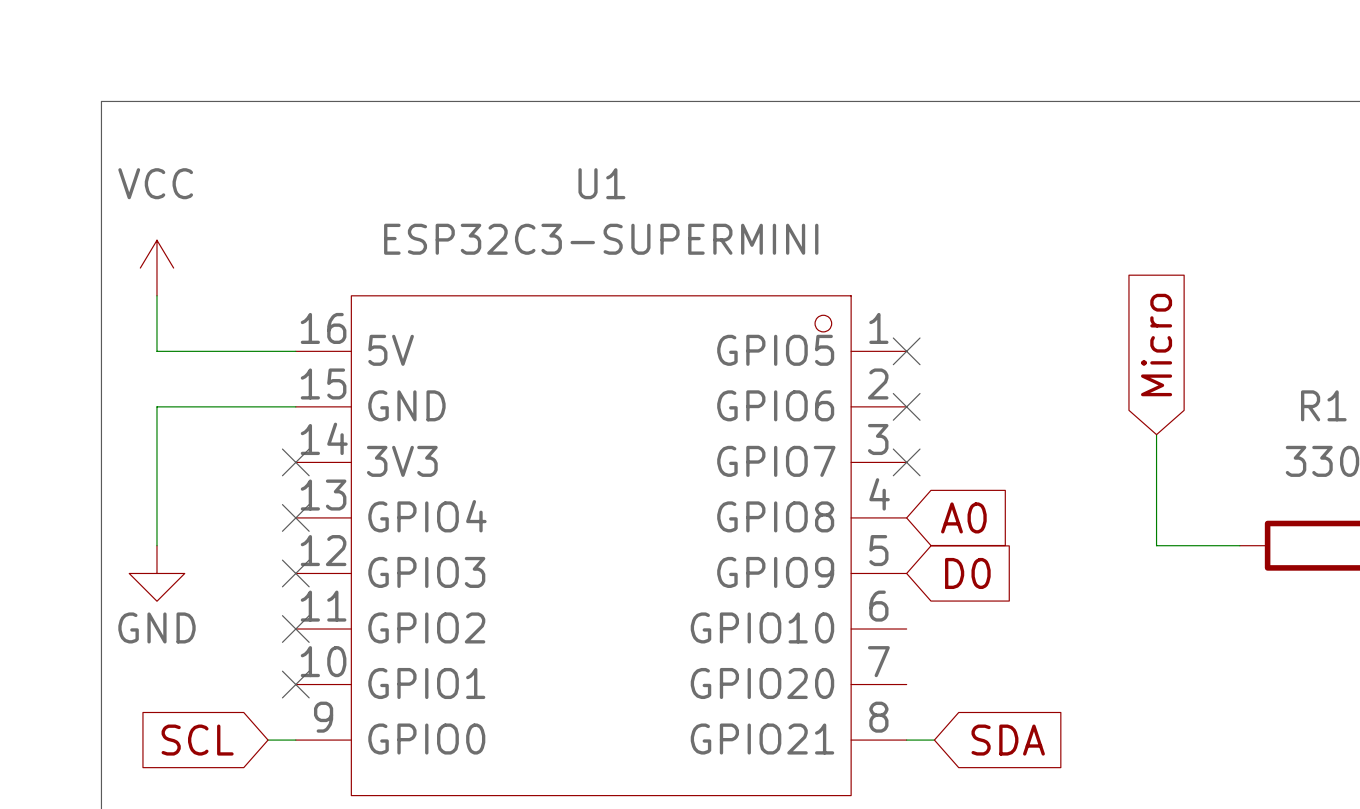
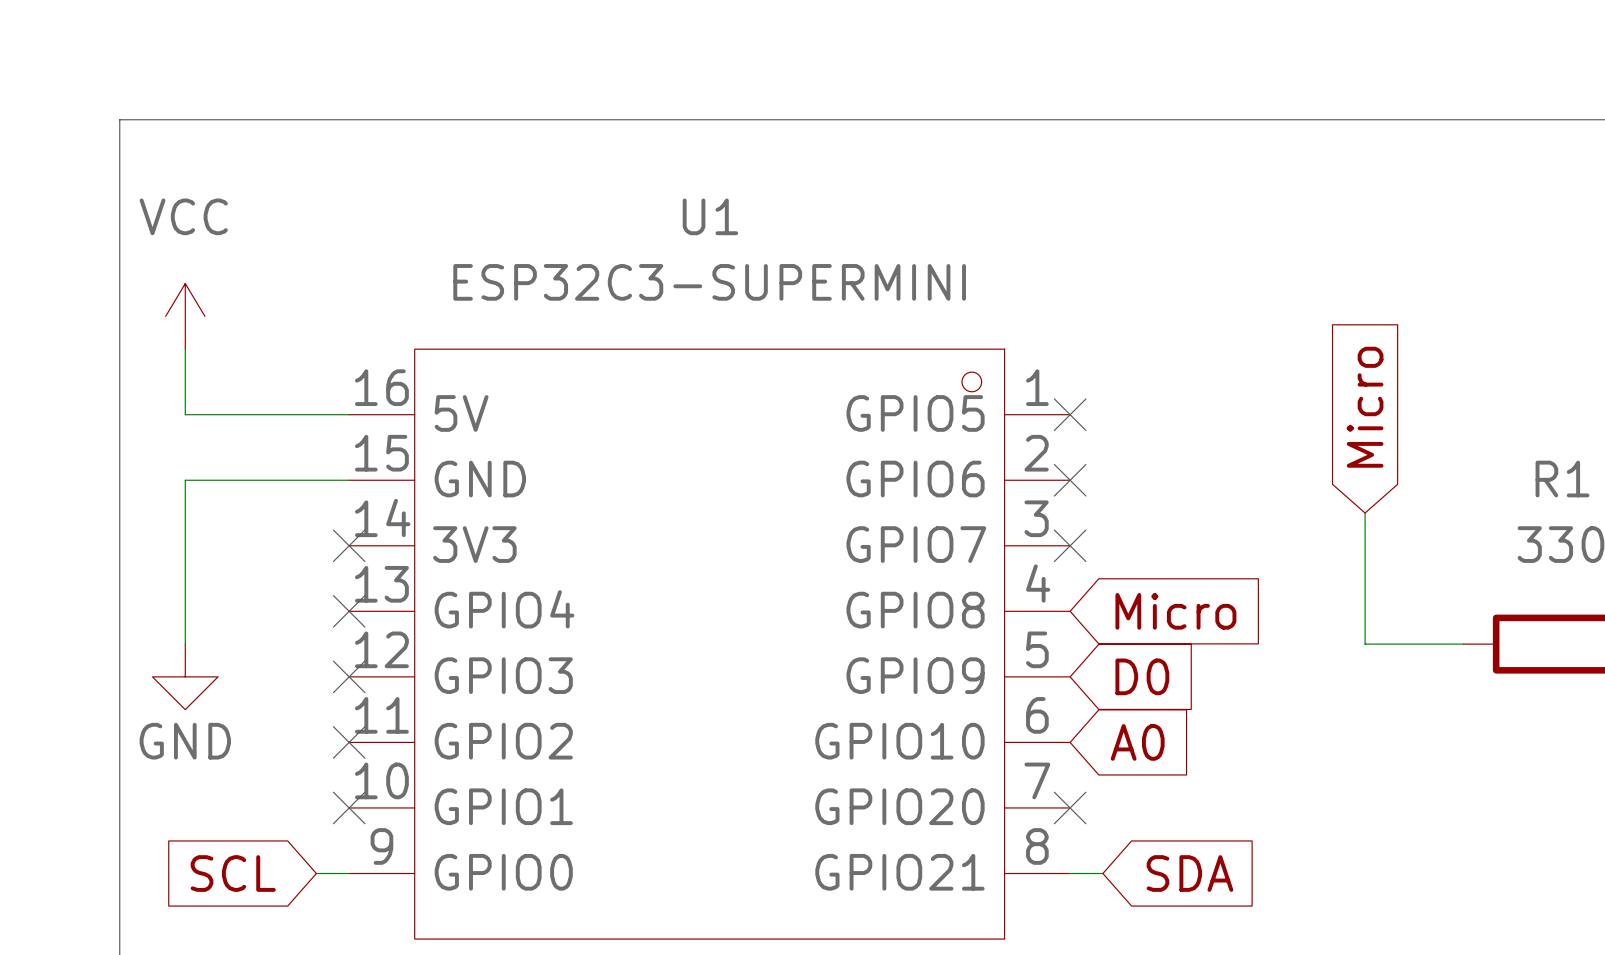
global label: A0 (963, 517) -> Micro (1175, 611)
global label: none -> A0 (1137, 742)
no-connect mark: none -> (1070, 807)

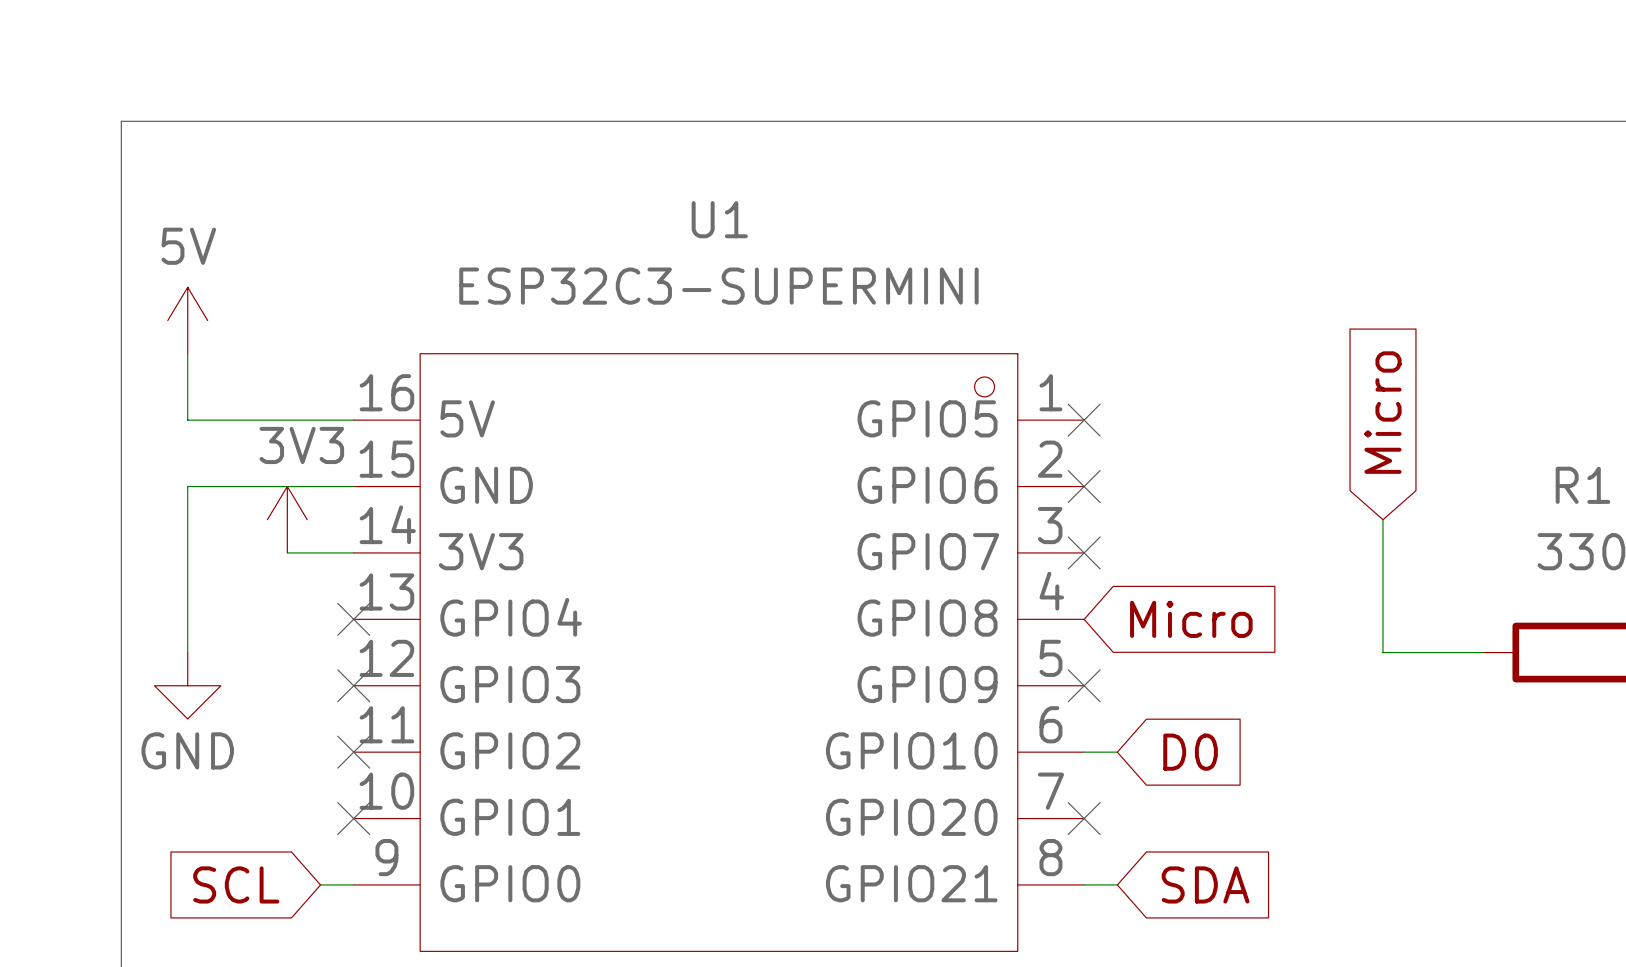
power symbol: VCC (185, 316) -> 5V (187, 320)
power symbol: none -> 3V3 (287, 519)
wire: none -> (287, 552) (353, 552)
no-connect mark: (349, 545) -> none
no-connect mark: none -> (1084, 685)
global label position: D0 (1142, 676) -> D0 (1190, 752)
wire: none -> (1084, 752) (1117, 752)
global label: A0 (1137, 742) -> none

